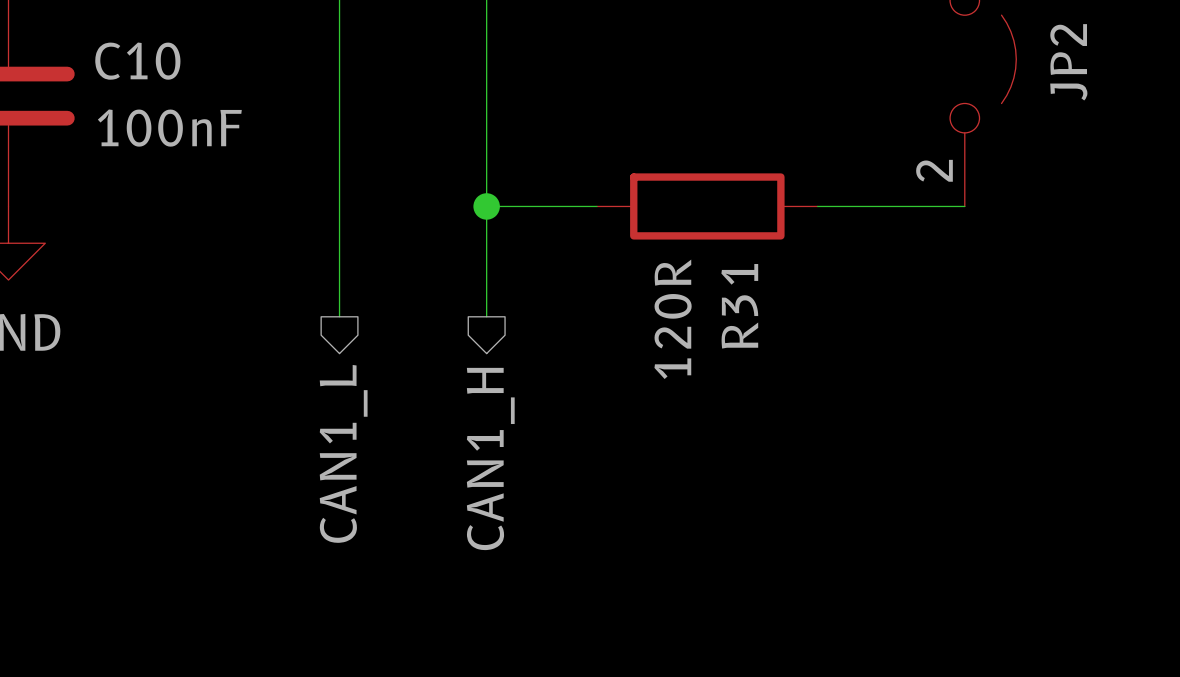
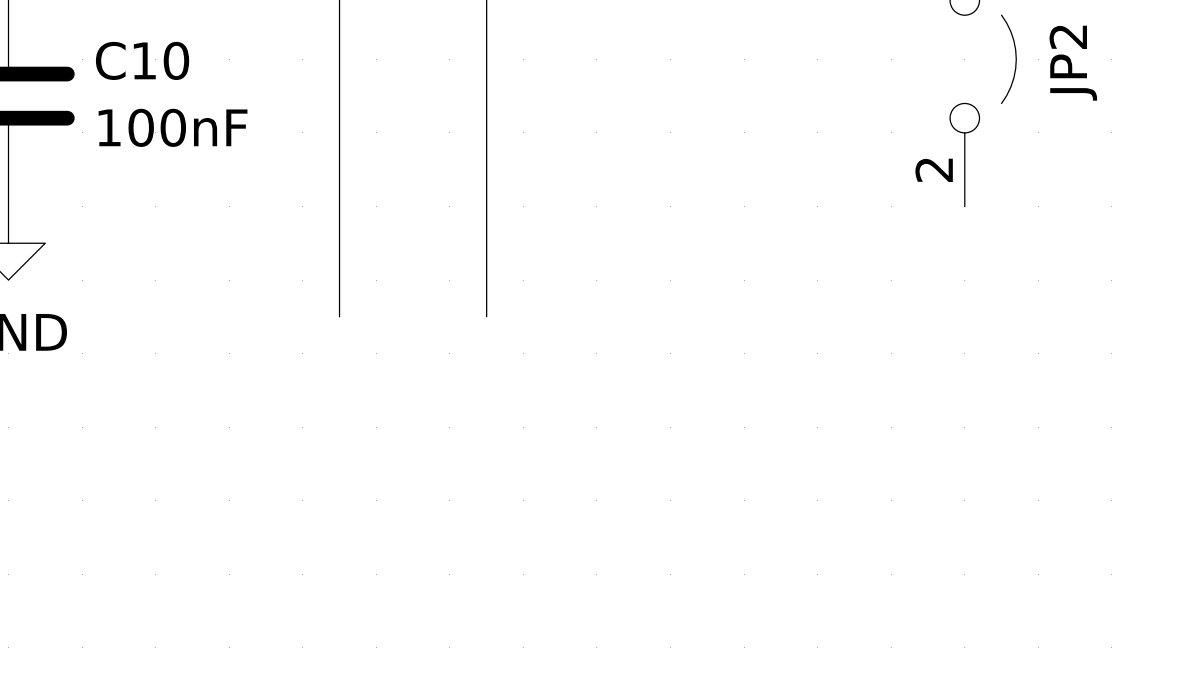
wire: (486, 206) (596, 206) -> none
junction: (486, 206) -> none
R31: 120R (707, 206) -> none
wire: (817, 206) (964, 206) -> none
hierarchical label: CAN1_L (343, 453) -> none
hierarchical label: CAN1_H (490, 458) -> none

